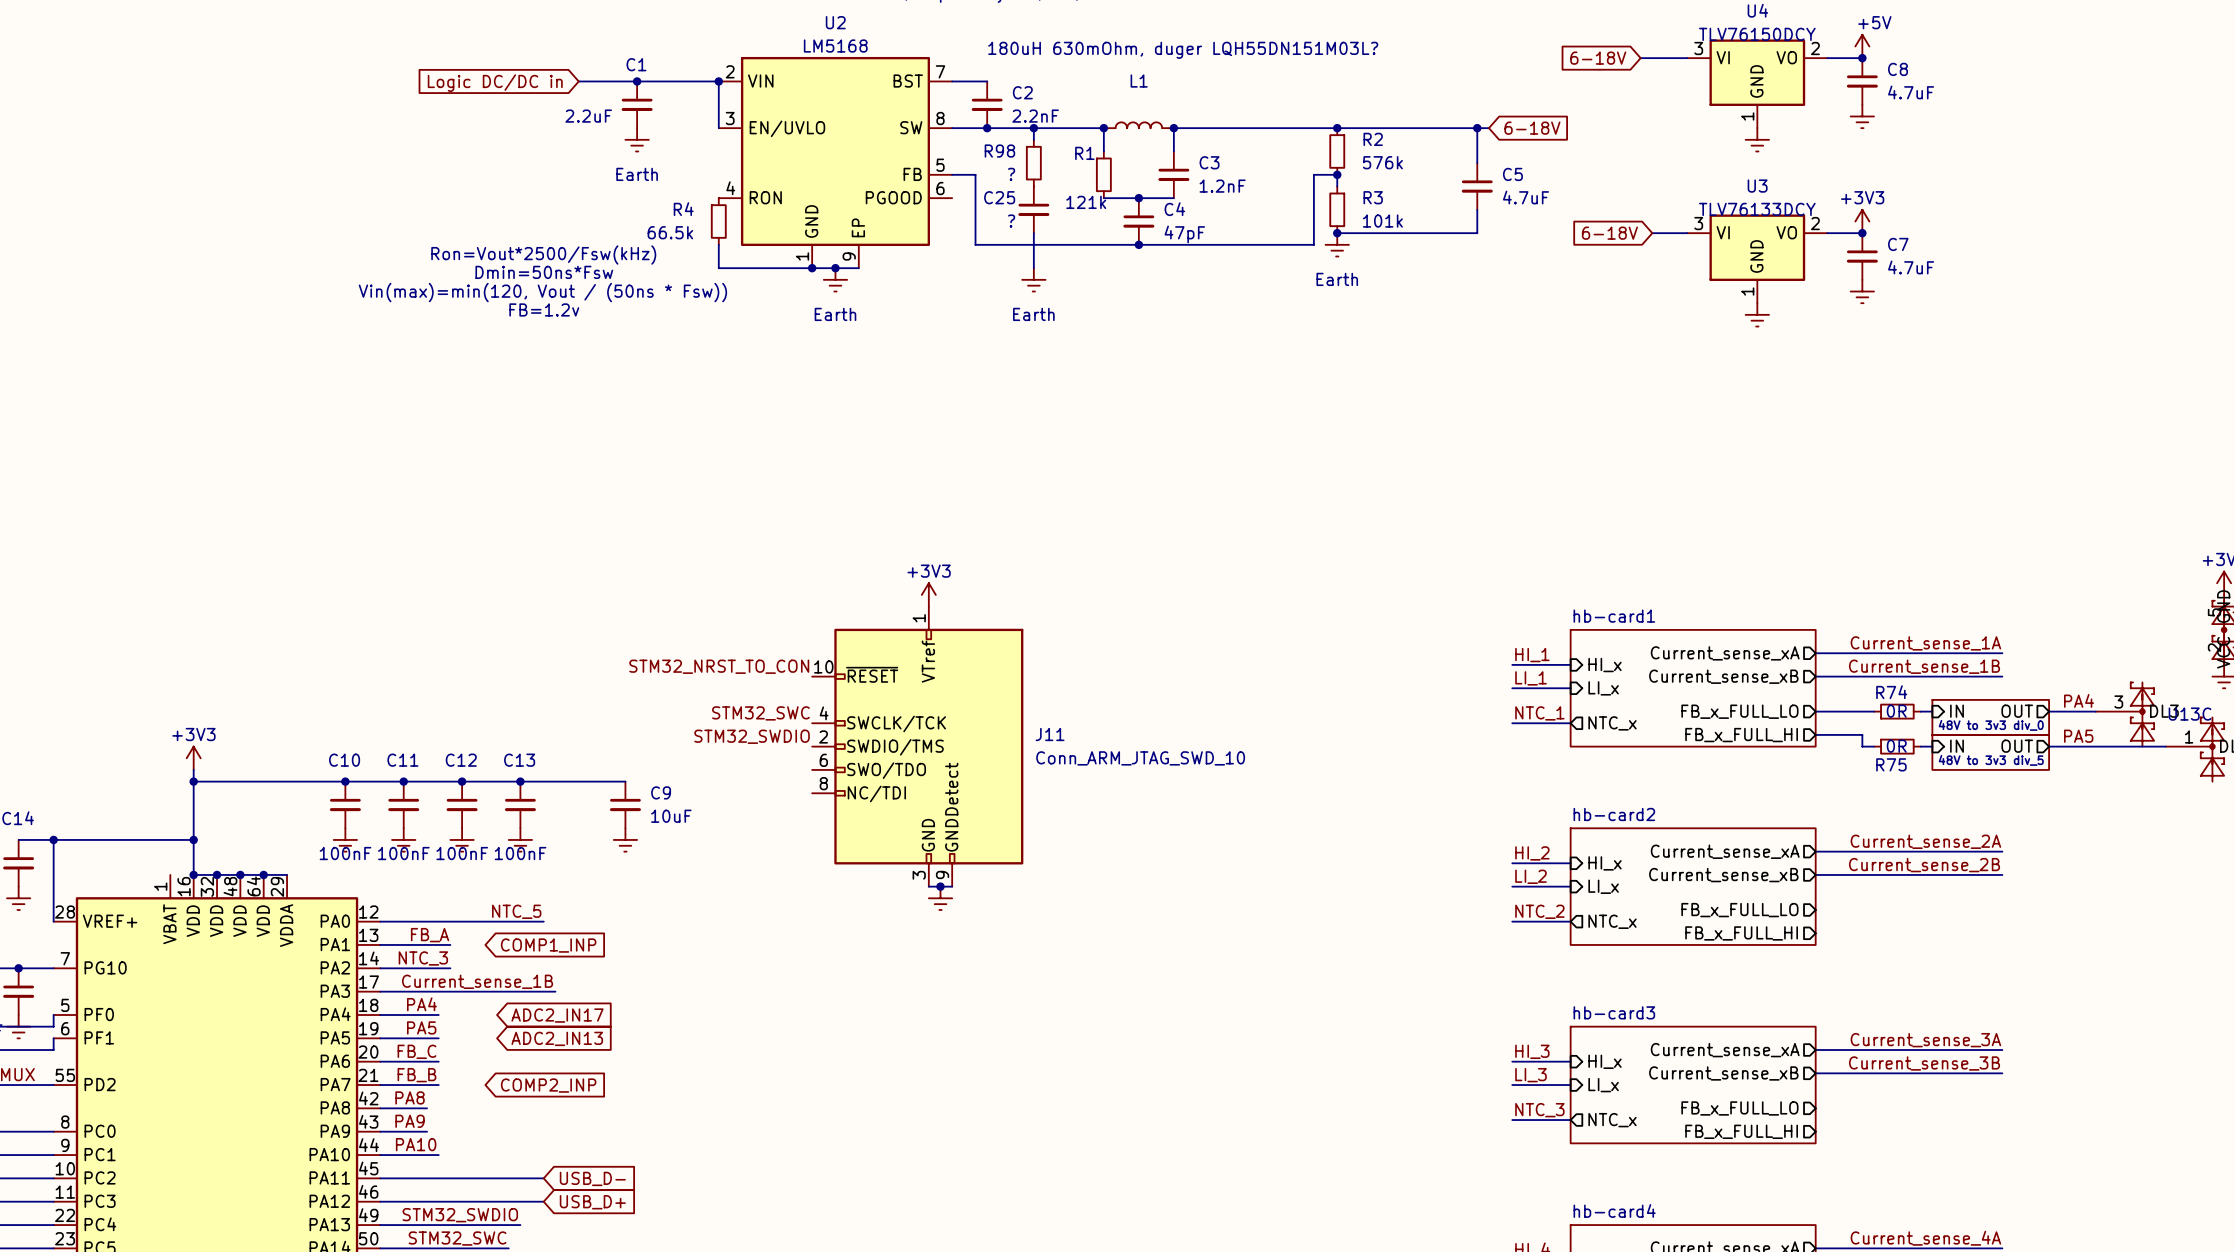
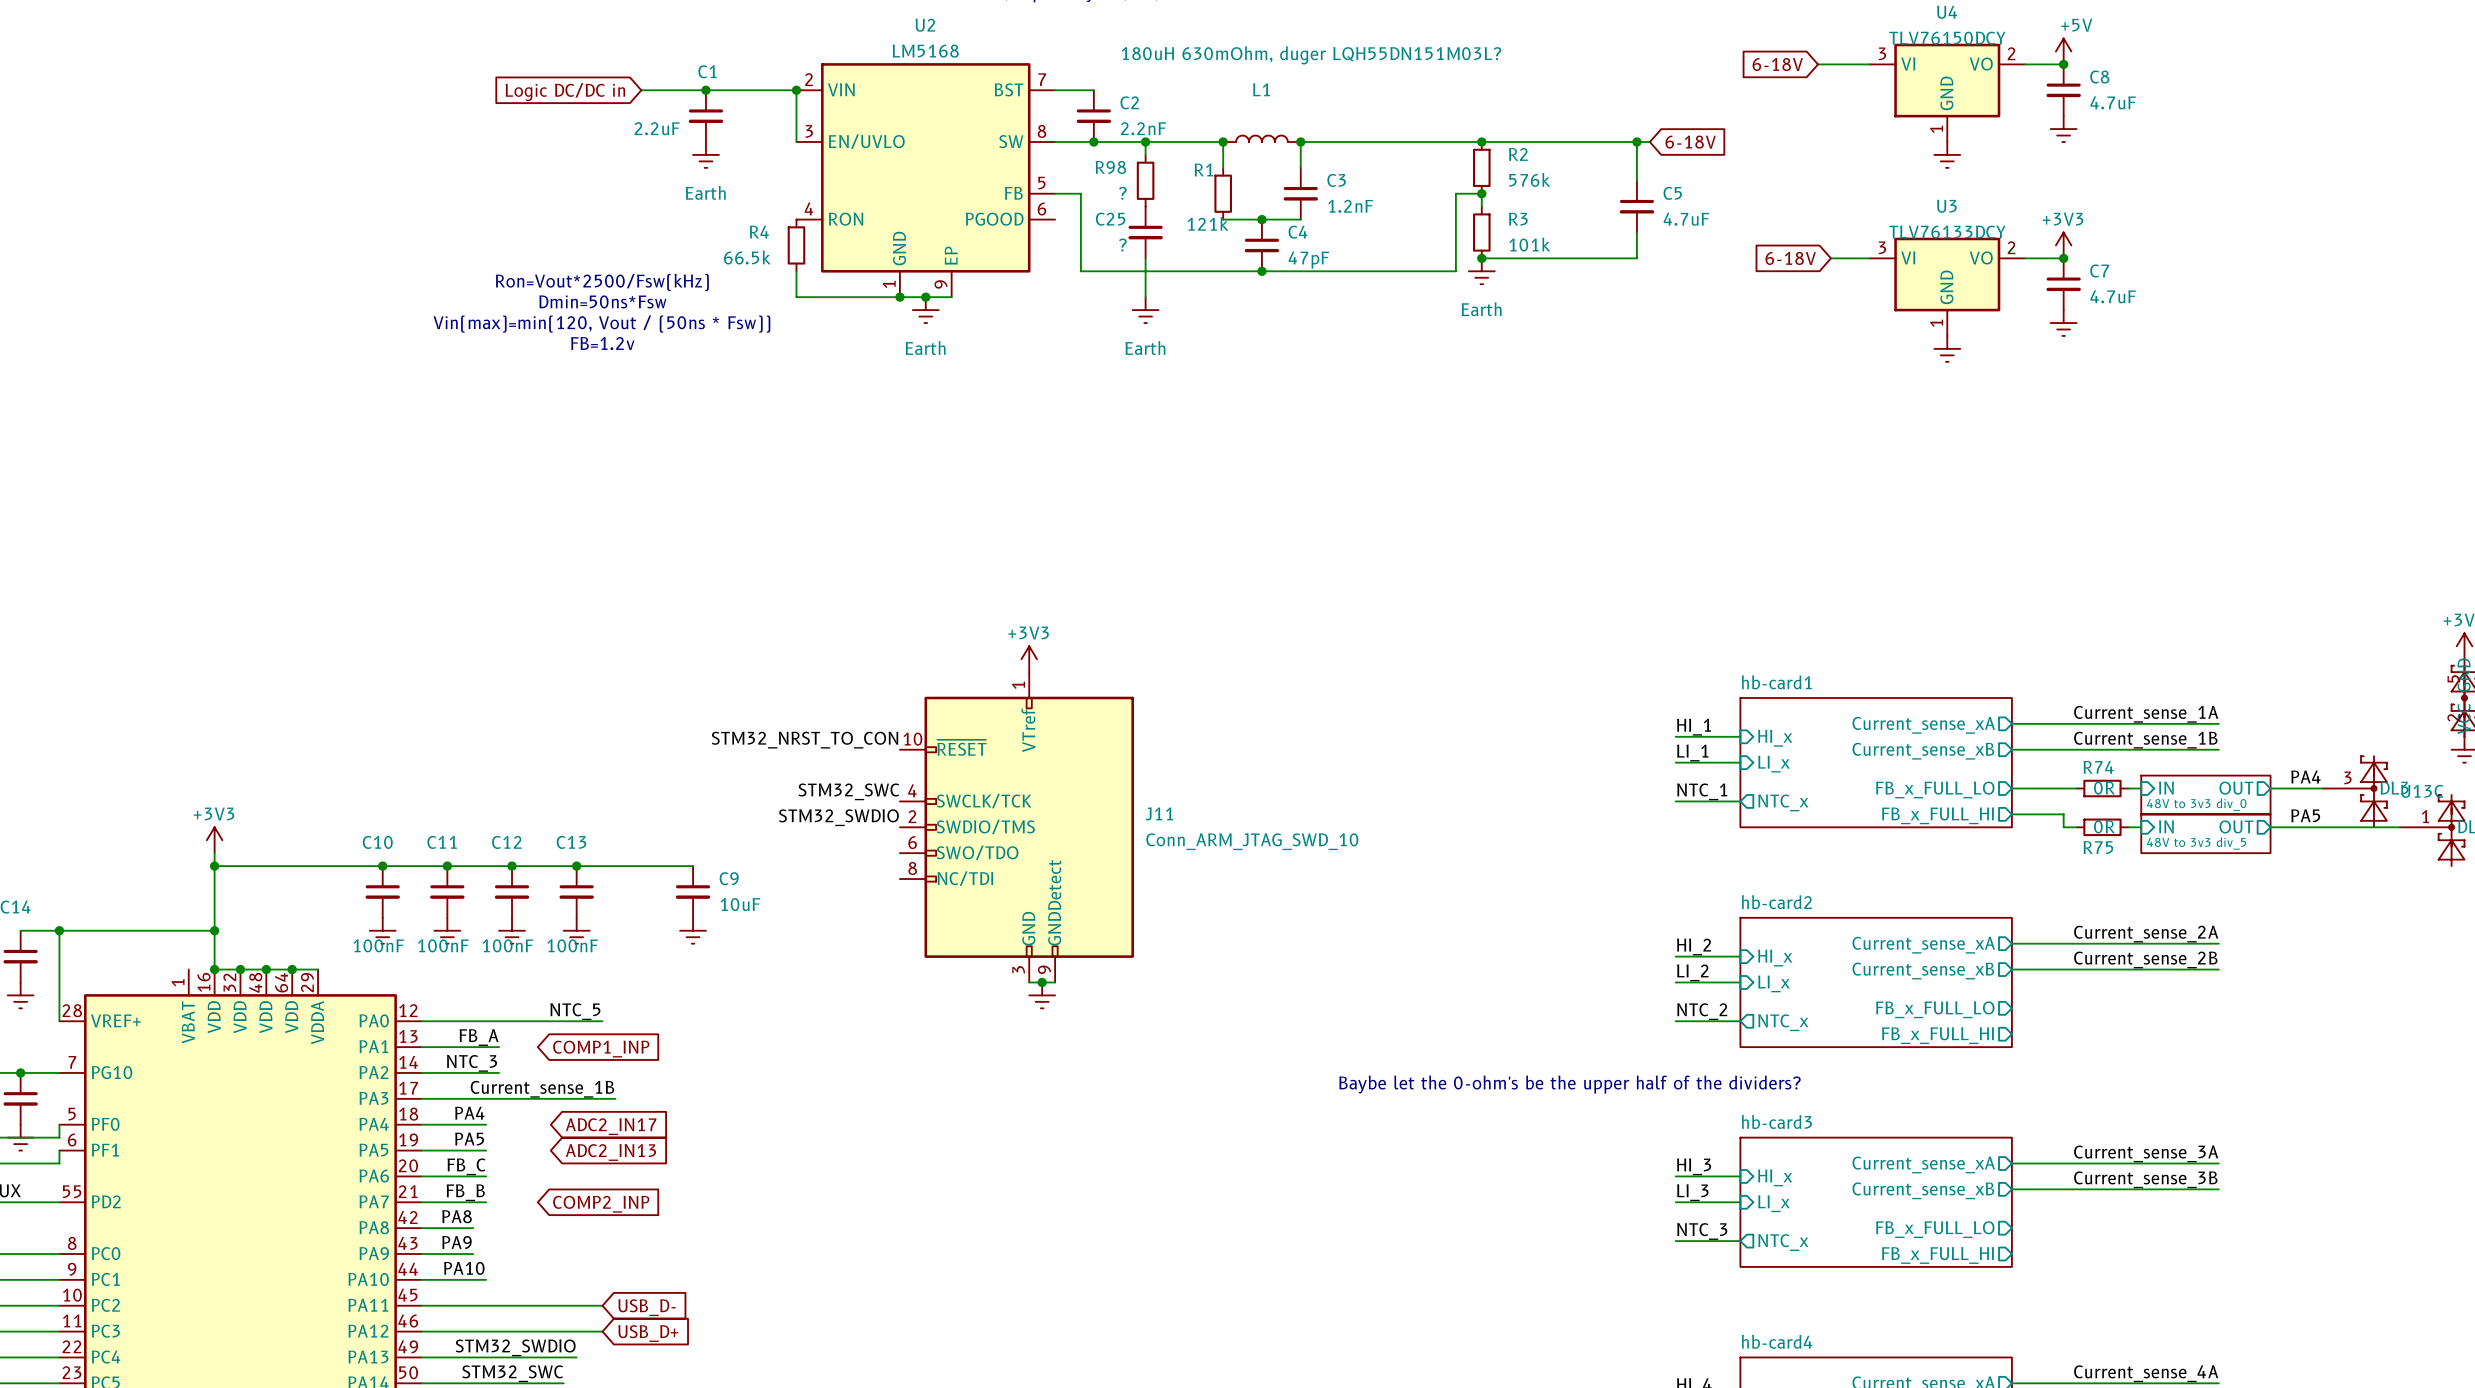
text: none -> Baybe let the 0-ohm's be the upper half of the dividers? (1569, 1084)

